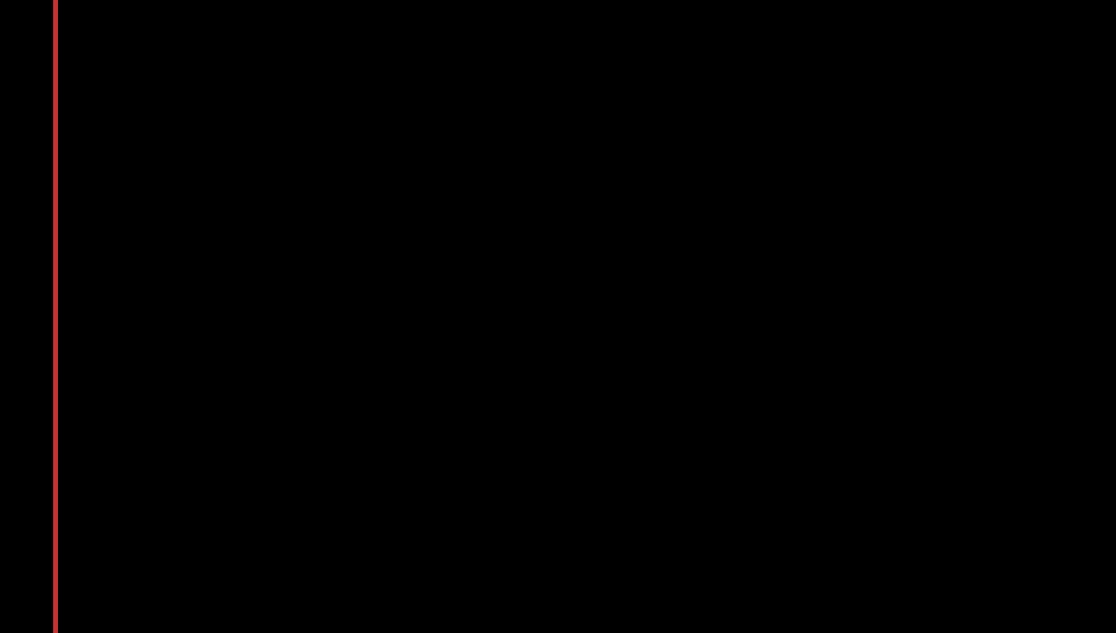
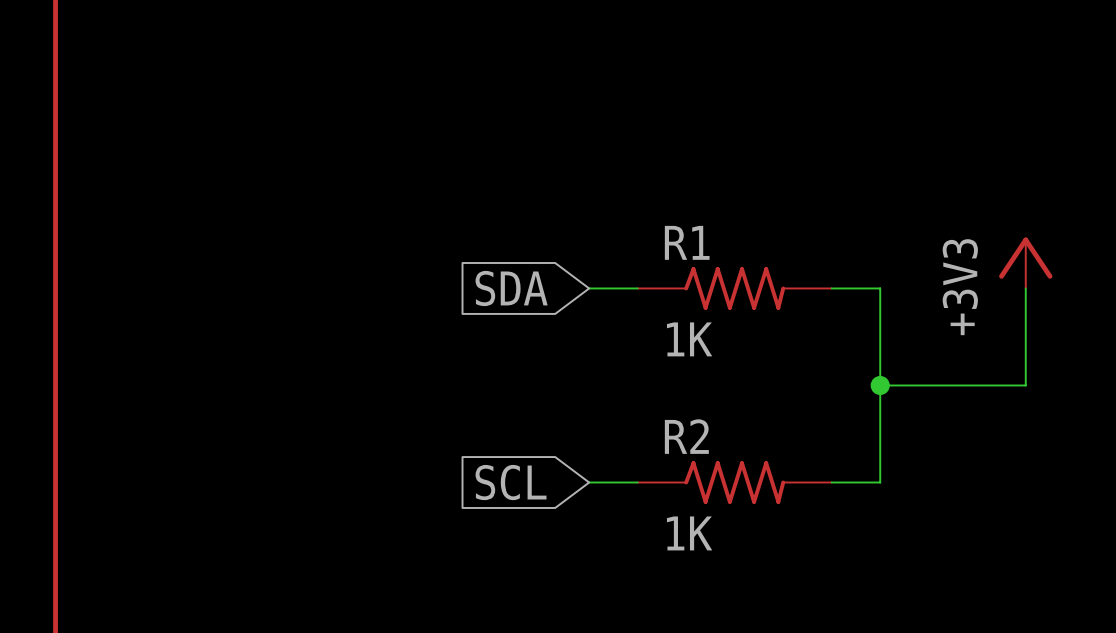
power symbol: none -> +3V3 (1025, 262)
global label: none -> SDA (511, 288)
wire: none -> (589, 288) (637, 288)
R1: none -> 1K (734, 288)
wire: none -> (831, 288) (880, 288) (880, 482) (831, 482)
wire: none -> (1025, 288) (1025, 385) (880, 385)
junction: none -> (880, 385)
global label: none -> SCL (511, 482)
wire: none -> (589, 482) (637, 482)
R2: none -> 1K (734, 482)

